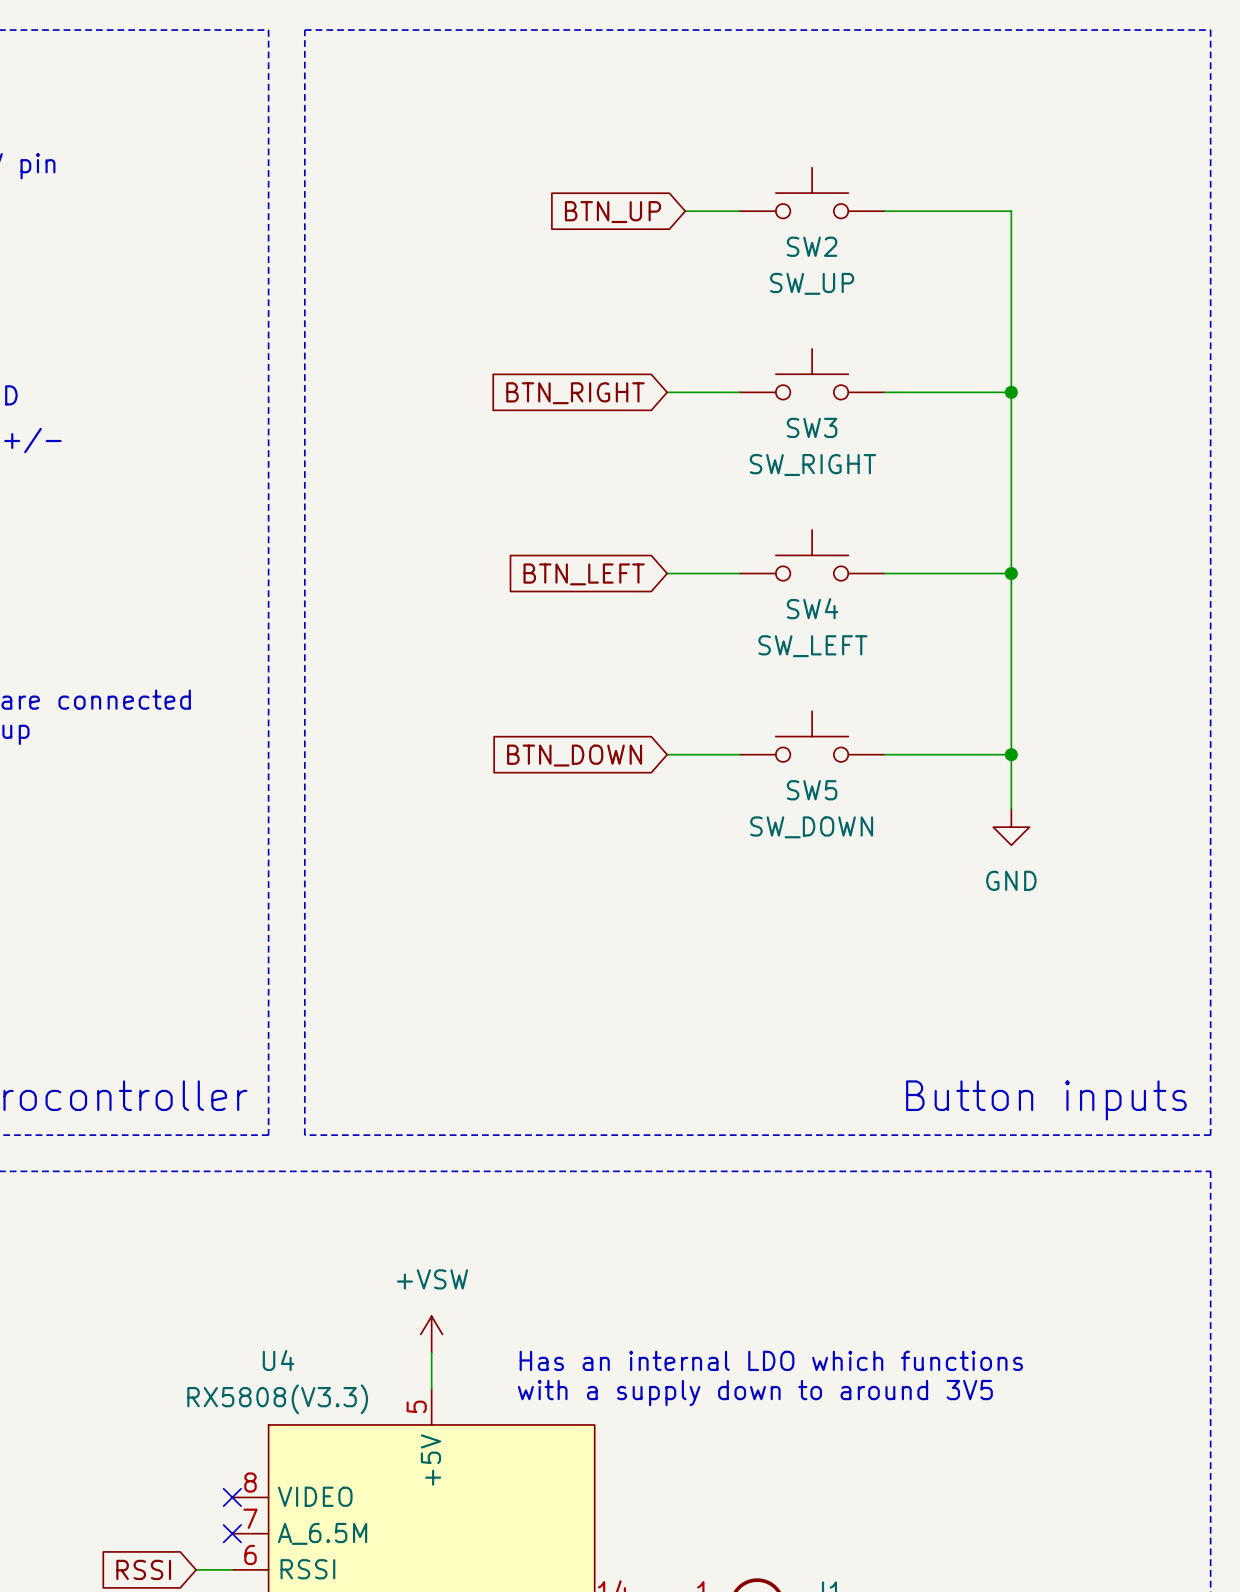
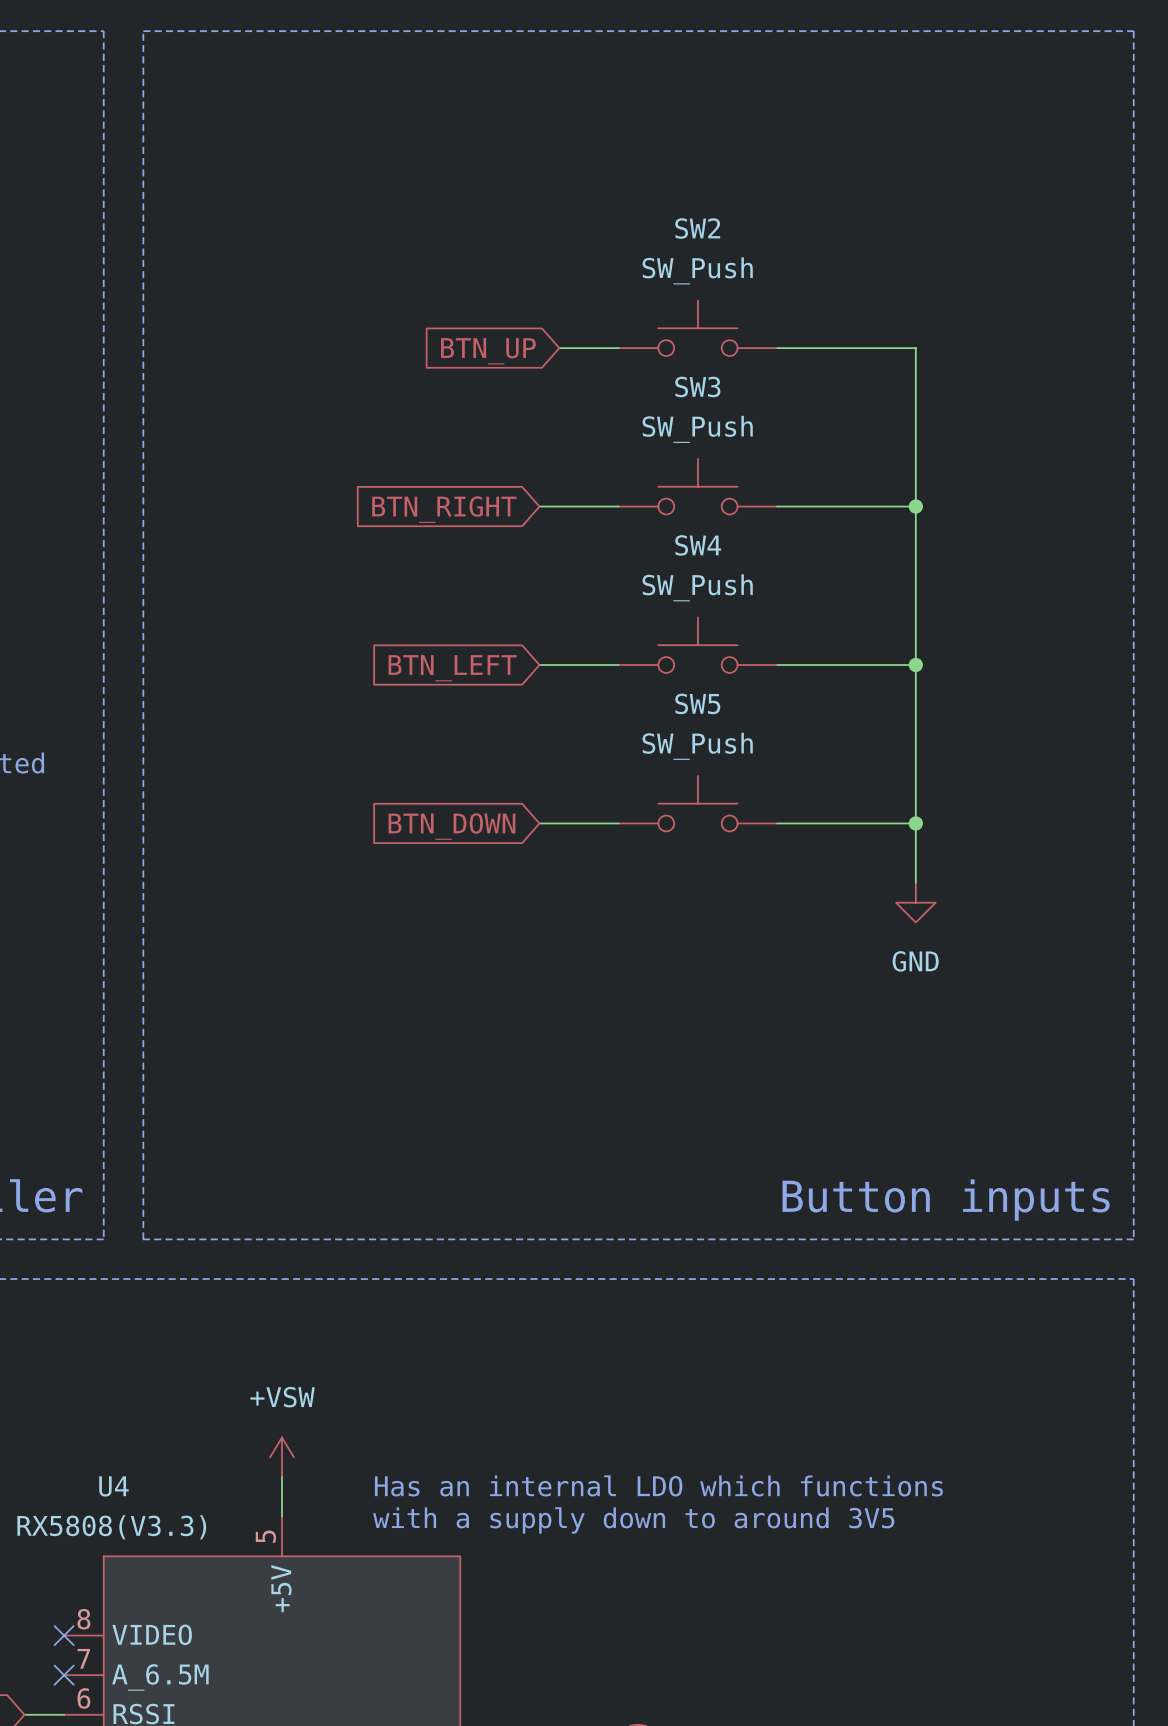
SW2 position: (812, 193) -> (697, 328)
wire: (685, 211) (739, 211) -> (559, 348) (618, 348)
wire: (884, 211) (1011, 211) (1011, 319) -> (777, 348) (915, 348)
global label position: BTN_UP (612, 212) -> BTN_UP (488, 351)
SW2 name position: SW2 (812, 246) -> SW2 (697, 228)
SW2 value: SW_UP (812, 283) -> SW_Push (697, 270)
SW3 position: (812, 374) -> (697, 486)
wire: (667, 392) (739, 392) -> (539, 506) (618, 506)
wire: (884, 392) (1011, 392) -> (777, 506) (915, 506)
junction: (1011, 392) -> none
global label position: BTN_RIGHT (575, 393) -> BTN_RIGHT (444, 509)
SW3 name position: SW3 (812, 427) -> SW3 (697, 386)
junction: none -> (915, 506)
SW3 value: SW_RIGHT (812, 465) -> SW_Push (697, 429)
SW4 position: (812, 555) -> (697, 645)
wire: (667, 573) (739, 573) -> (539, 665) (618, 665)
wire: (884, 573) (1011, 573) -> (777, 665) (915, 665)
junction position: (1011, 573) -> (915, 665)
global label position: BTN_LEFT (584, 574) -> BTN_LEFT (452, 668)
SW4 name position: SW4 (812, 608) -> SW4 (698, 545)
SW4 value: SW_LEFT (812, 646) -> SW_Push (697, 587)
SW5 name position: SW5 (812, 790) -> SW5 (697, 703)
SW5 value: SW_DOWN (811, 827) -> SW_Push (697, 746)

